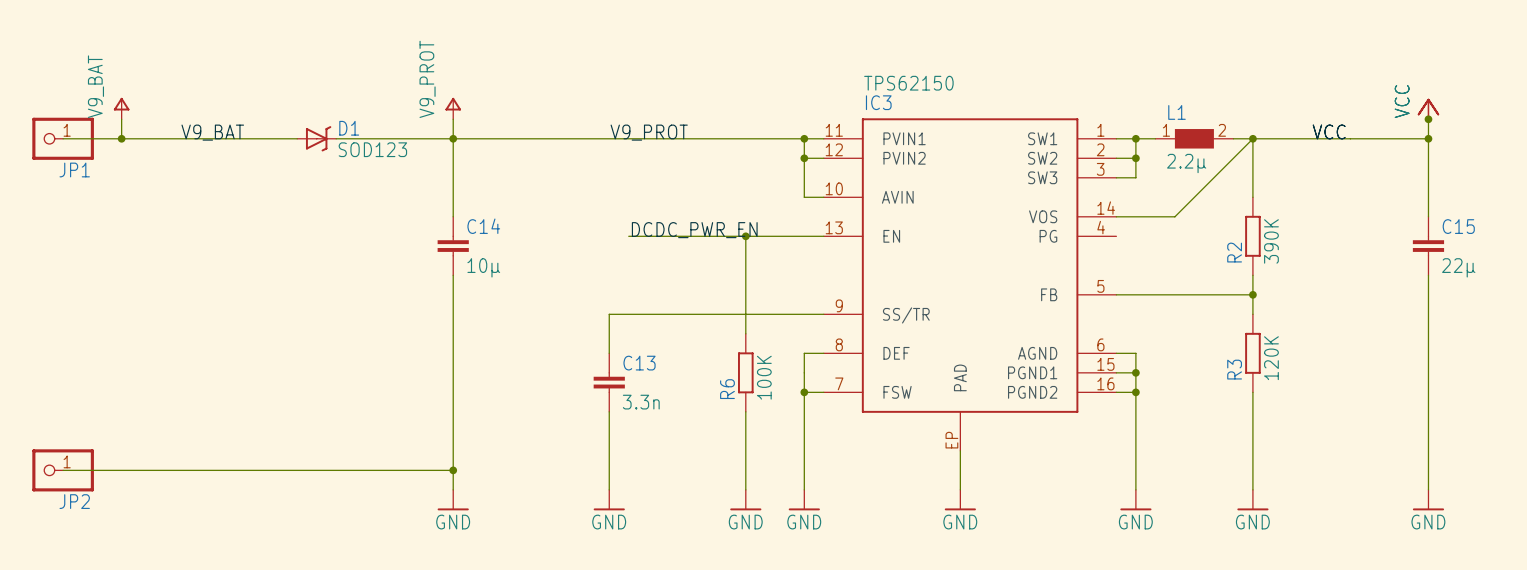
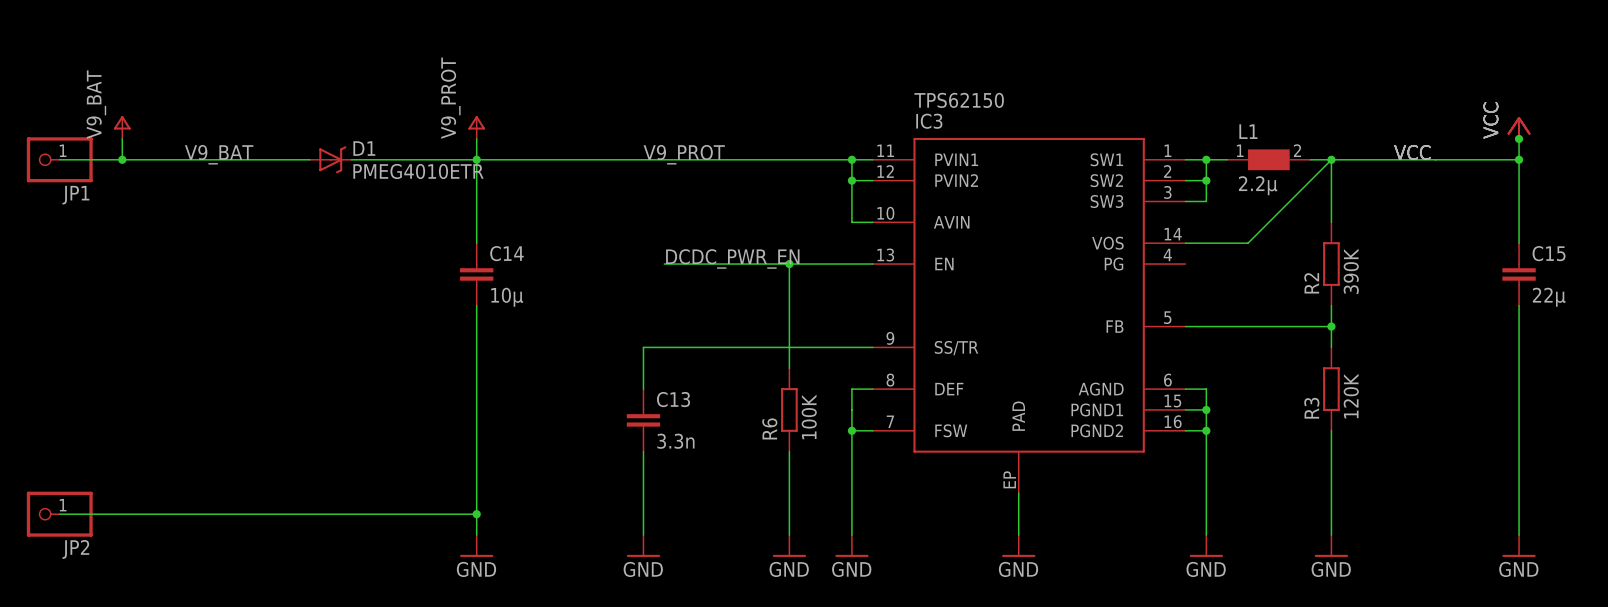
D1 value: SOD123 (372, 149) -> PMEG4010ETR (418, 171)

